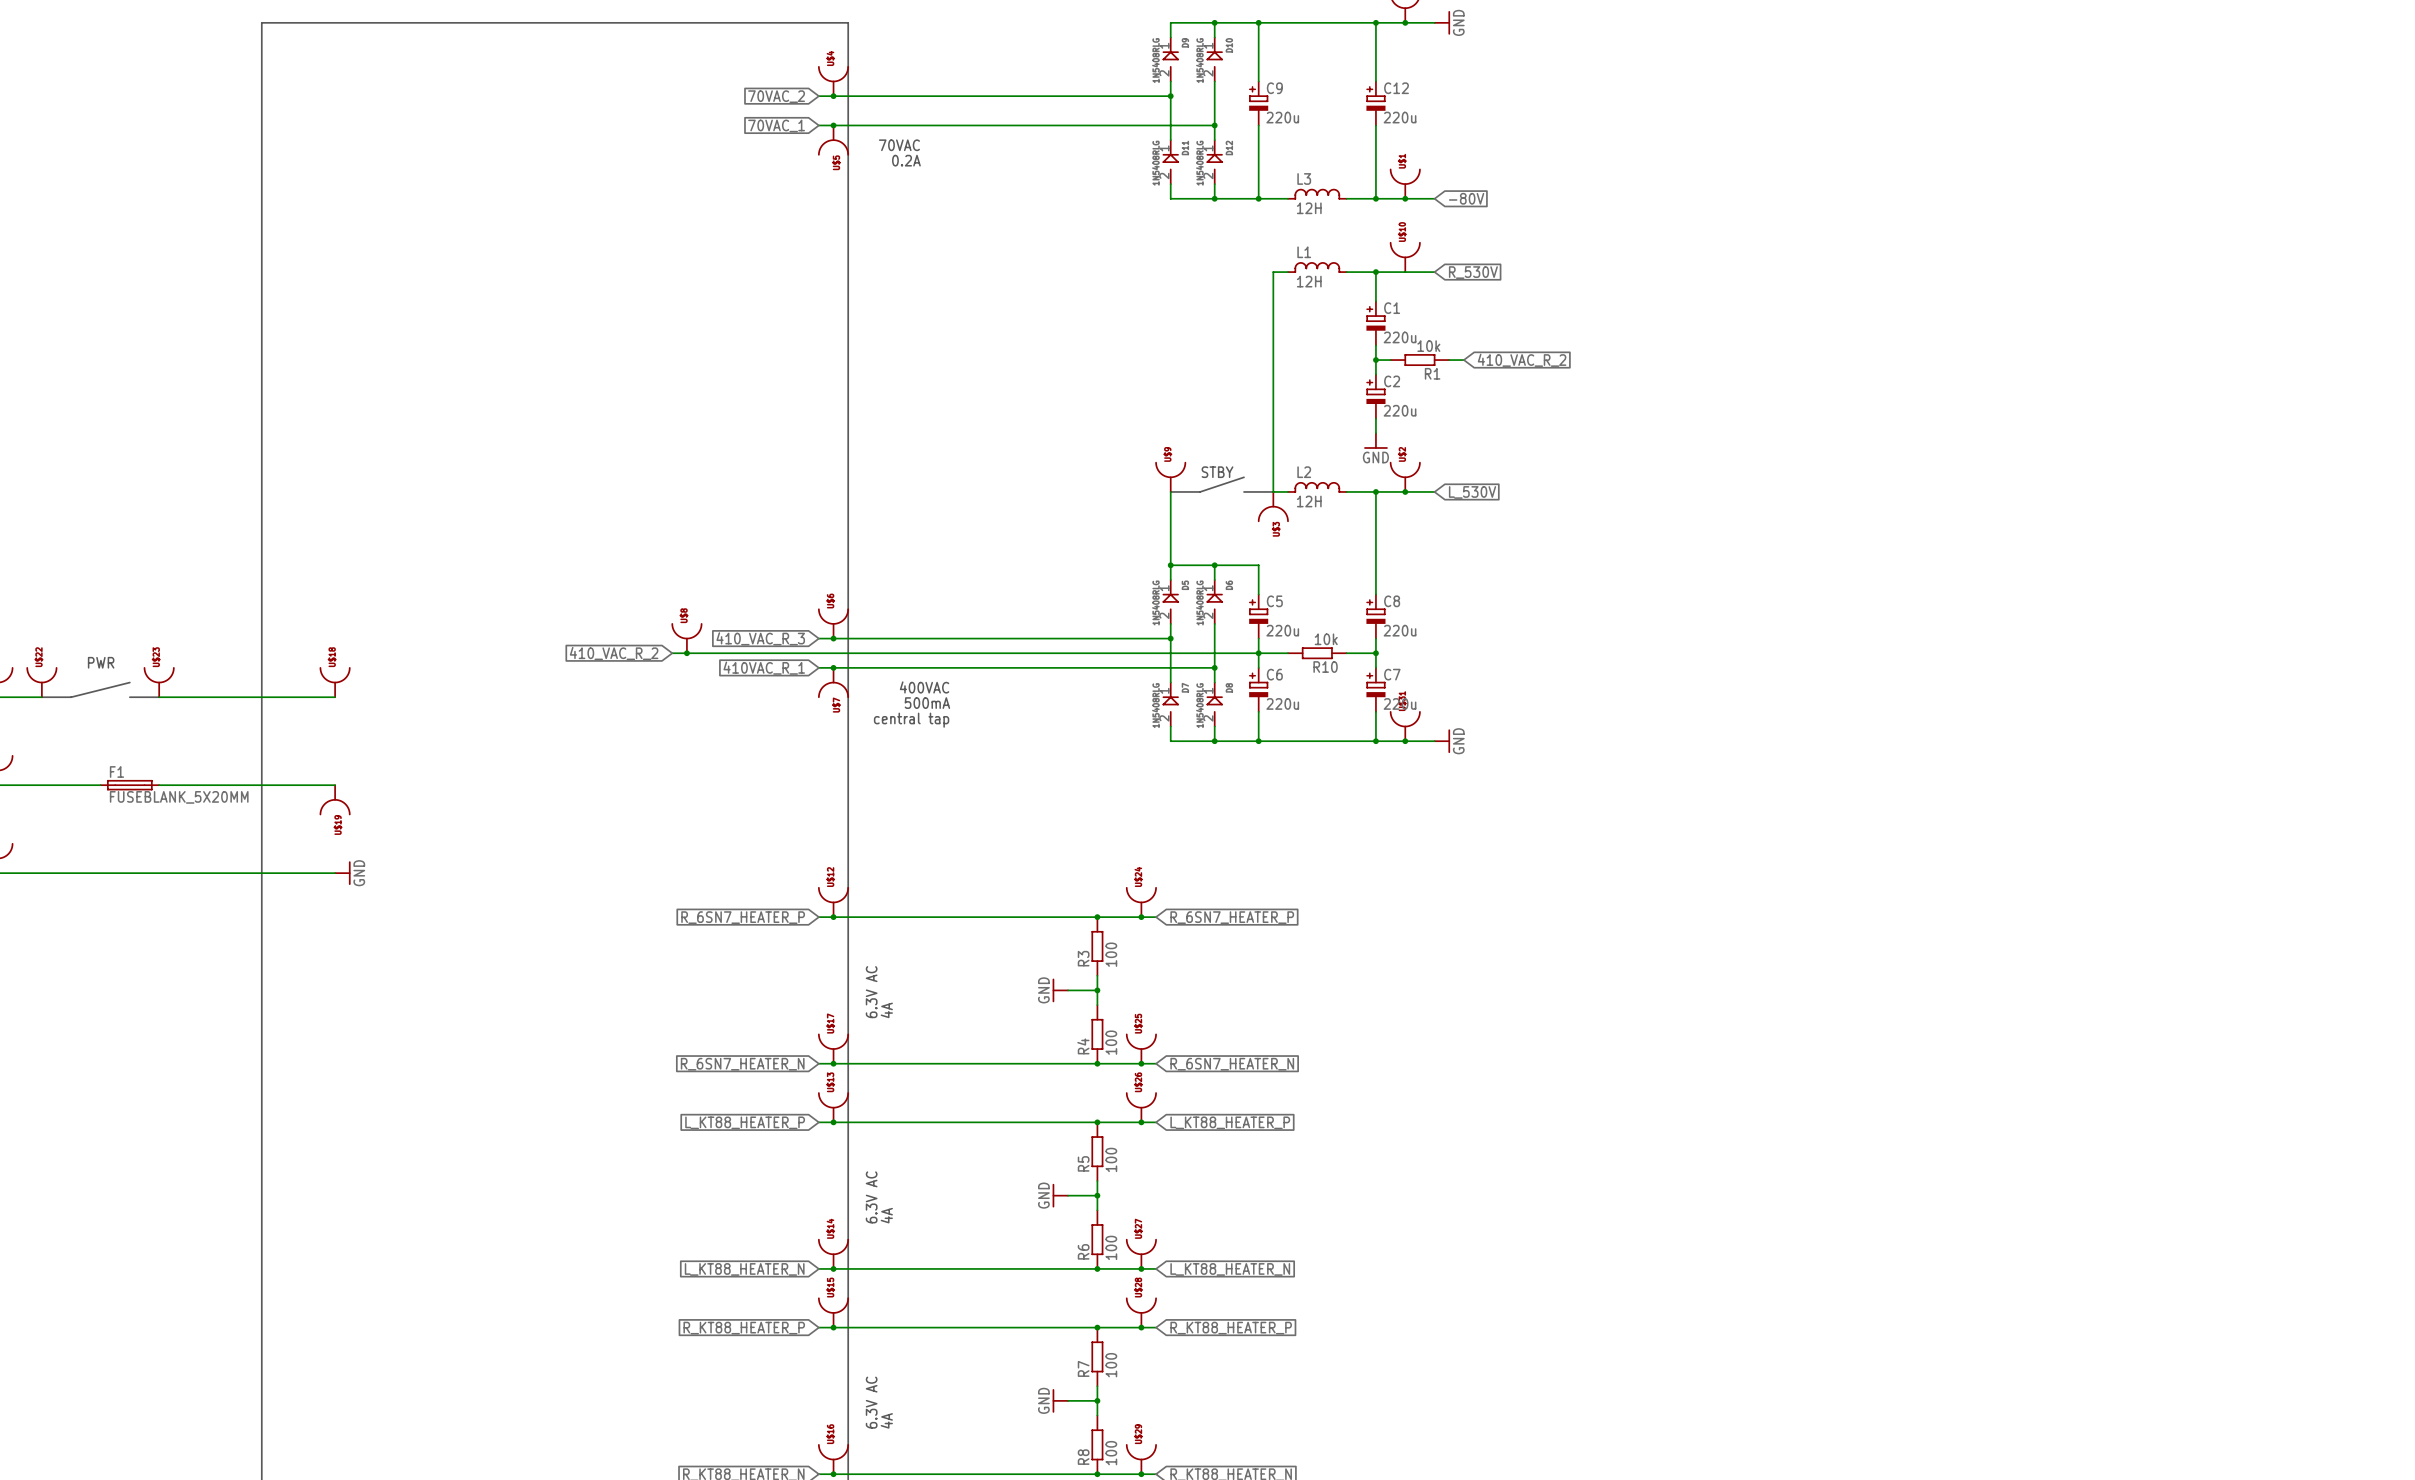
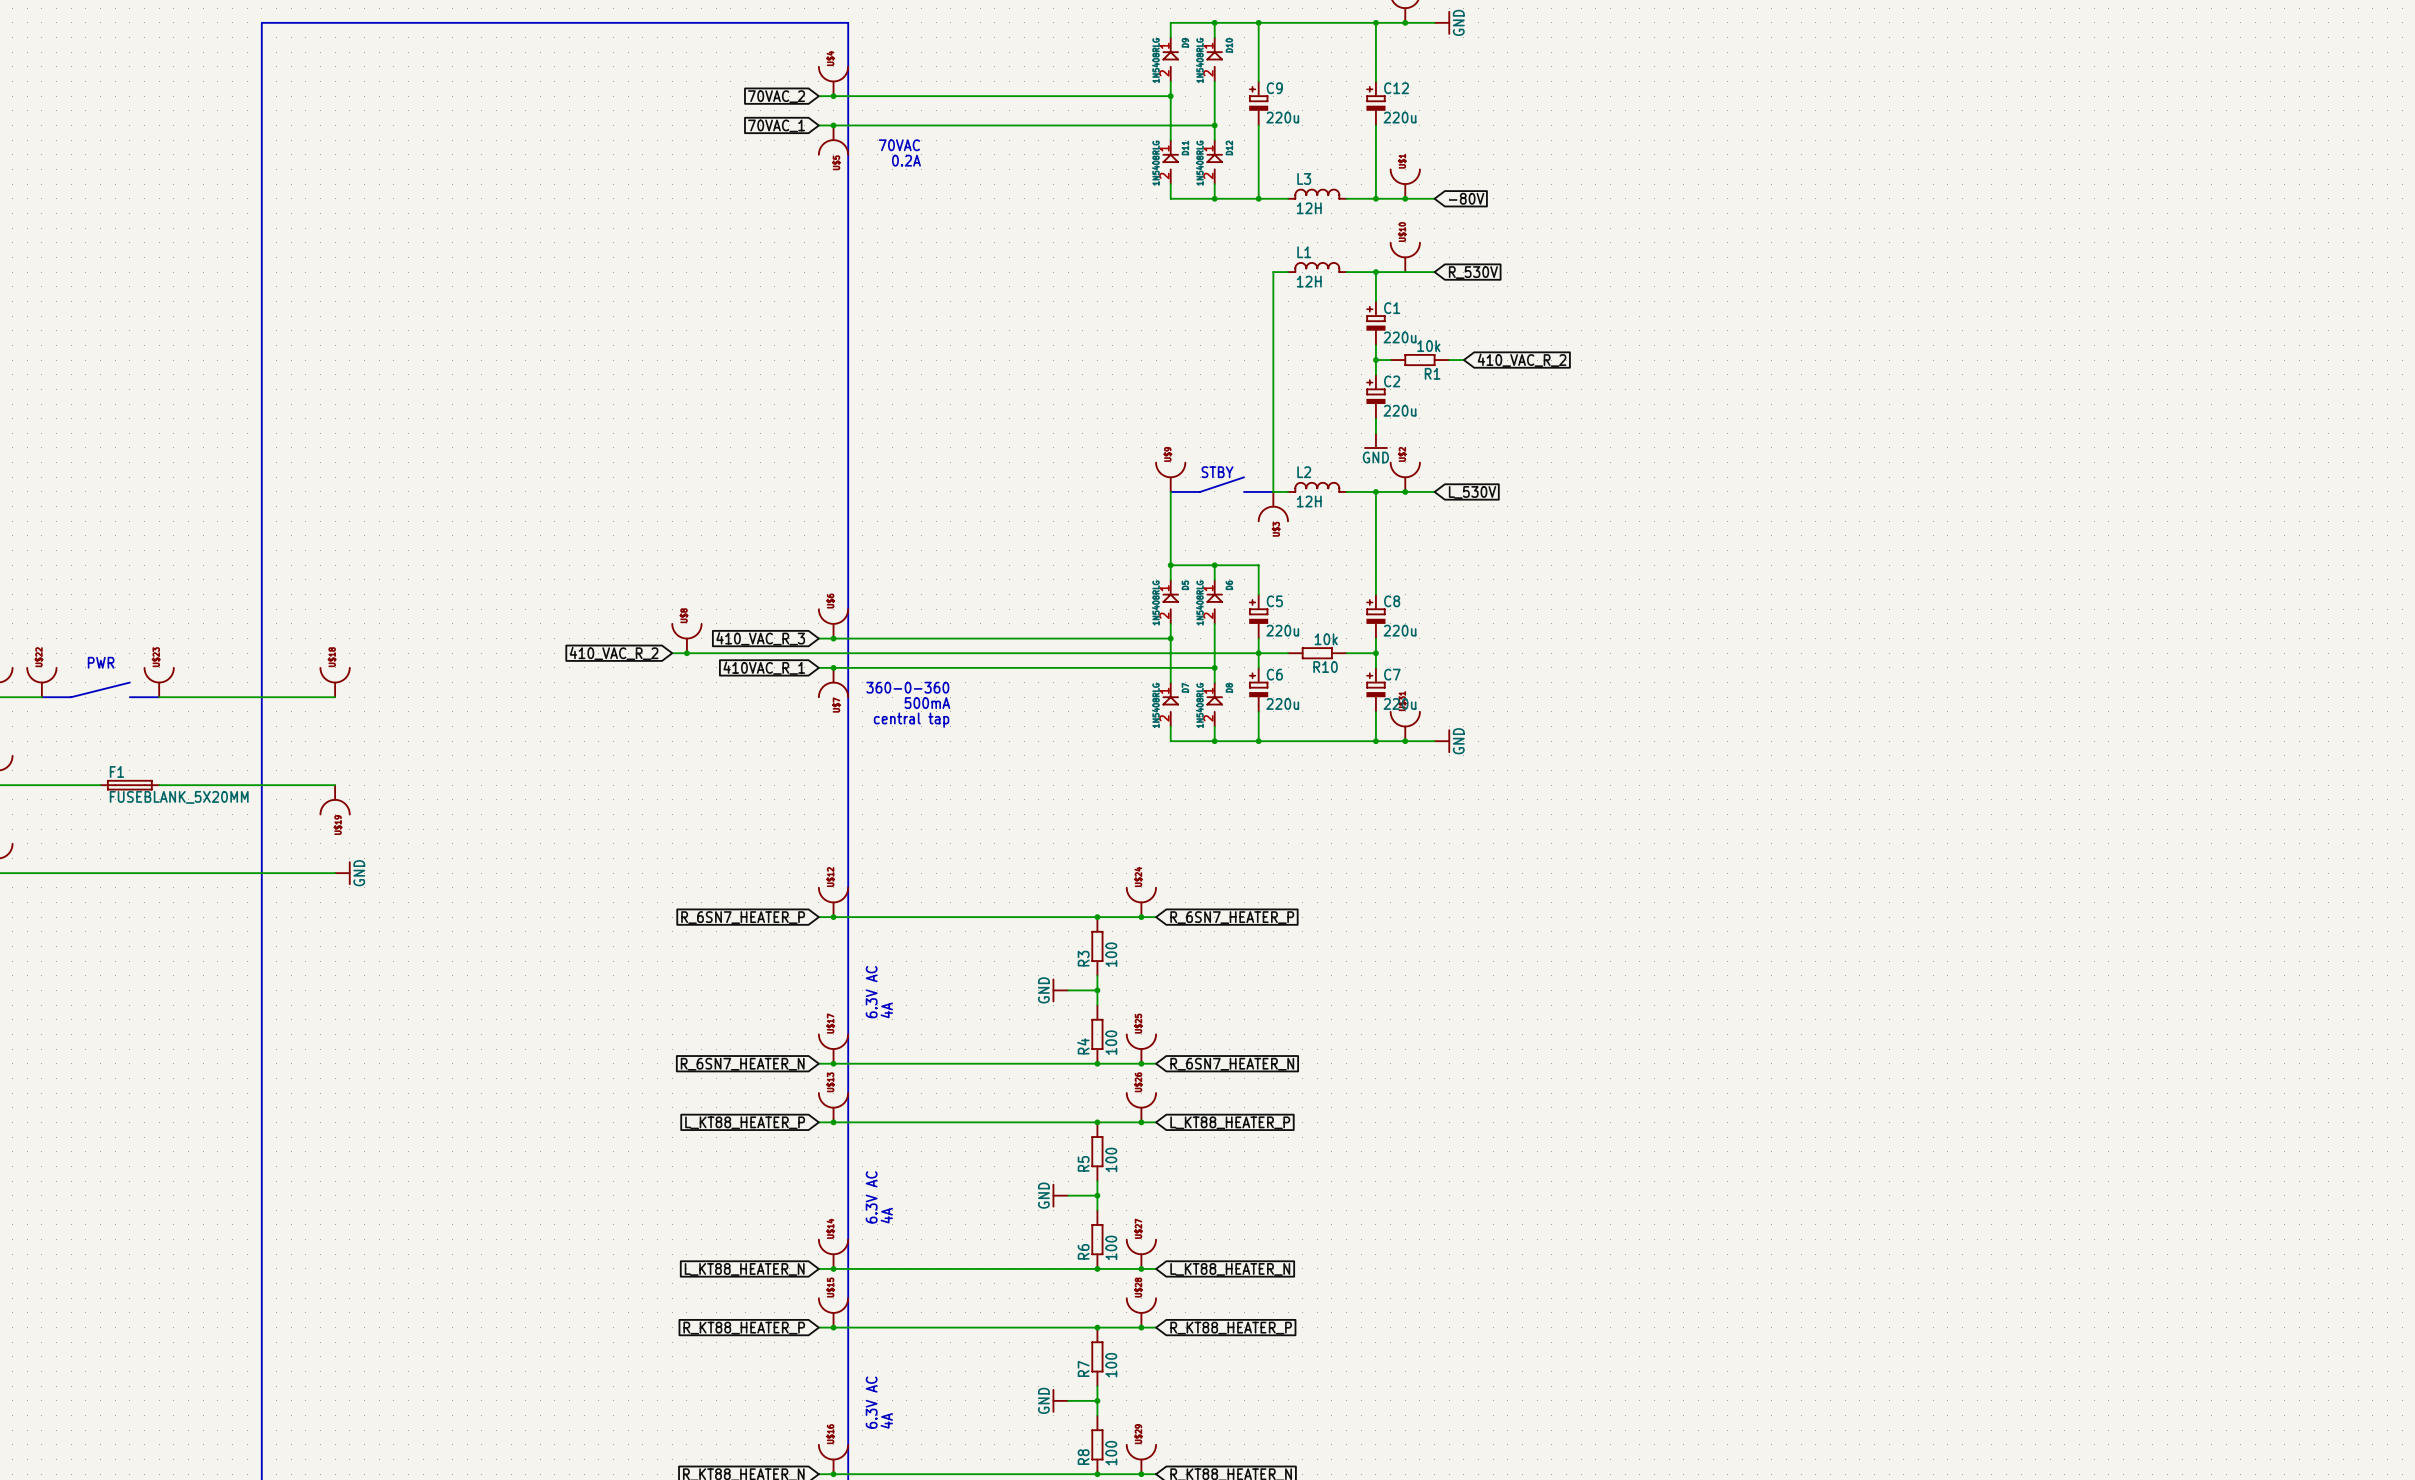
text: 400VAC (924, 687) -> 360-0-360 (907, 687)

